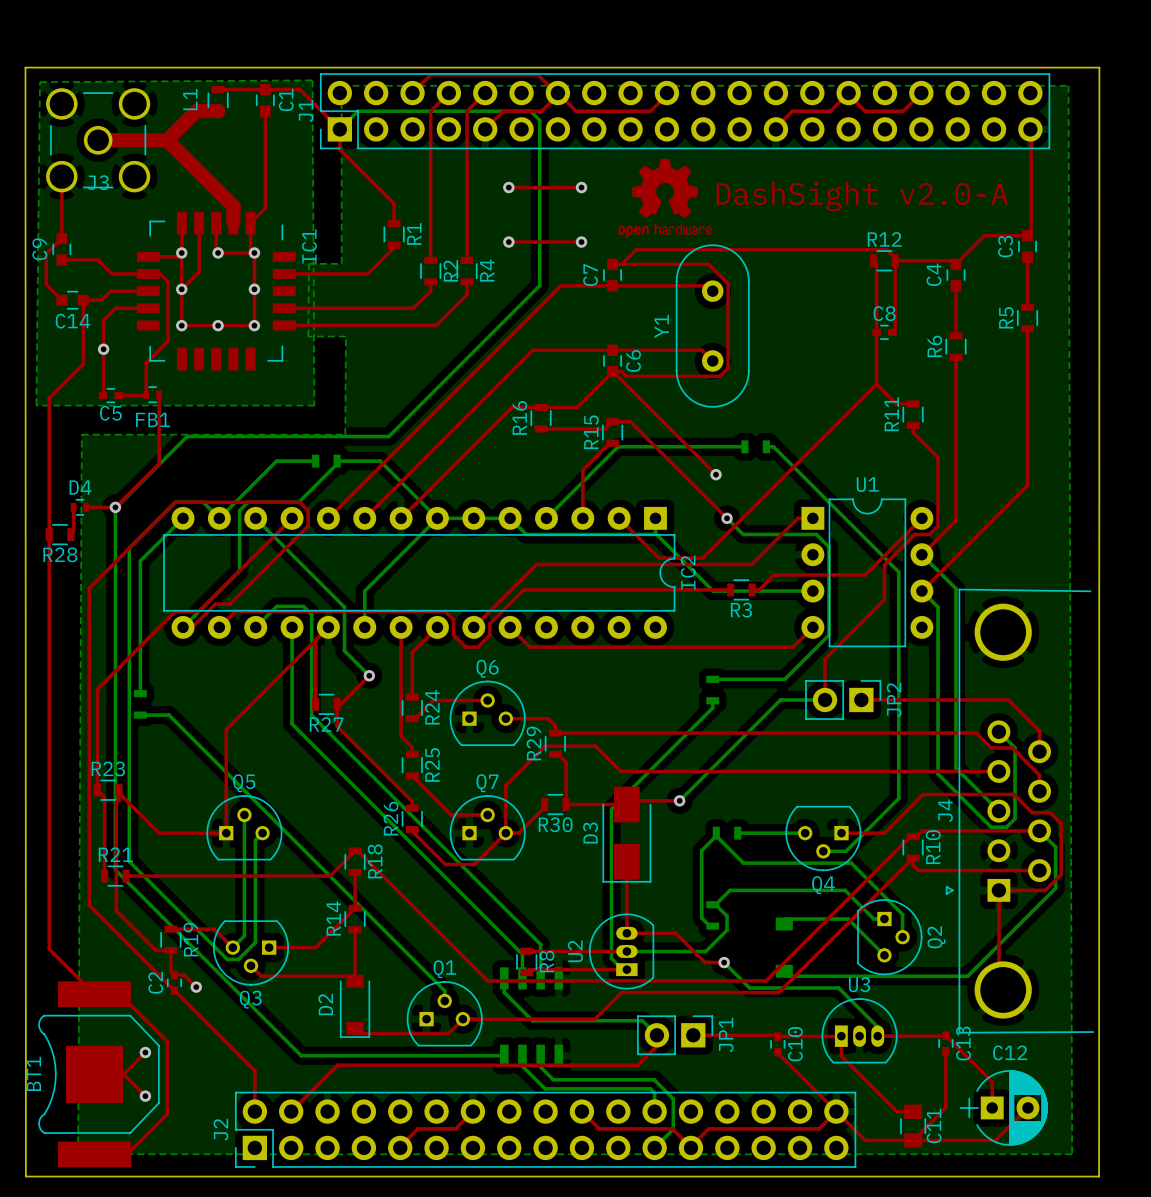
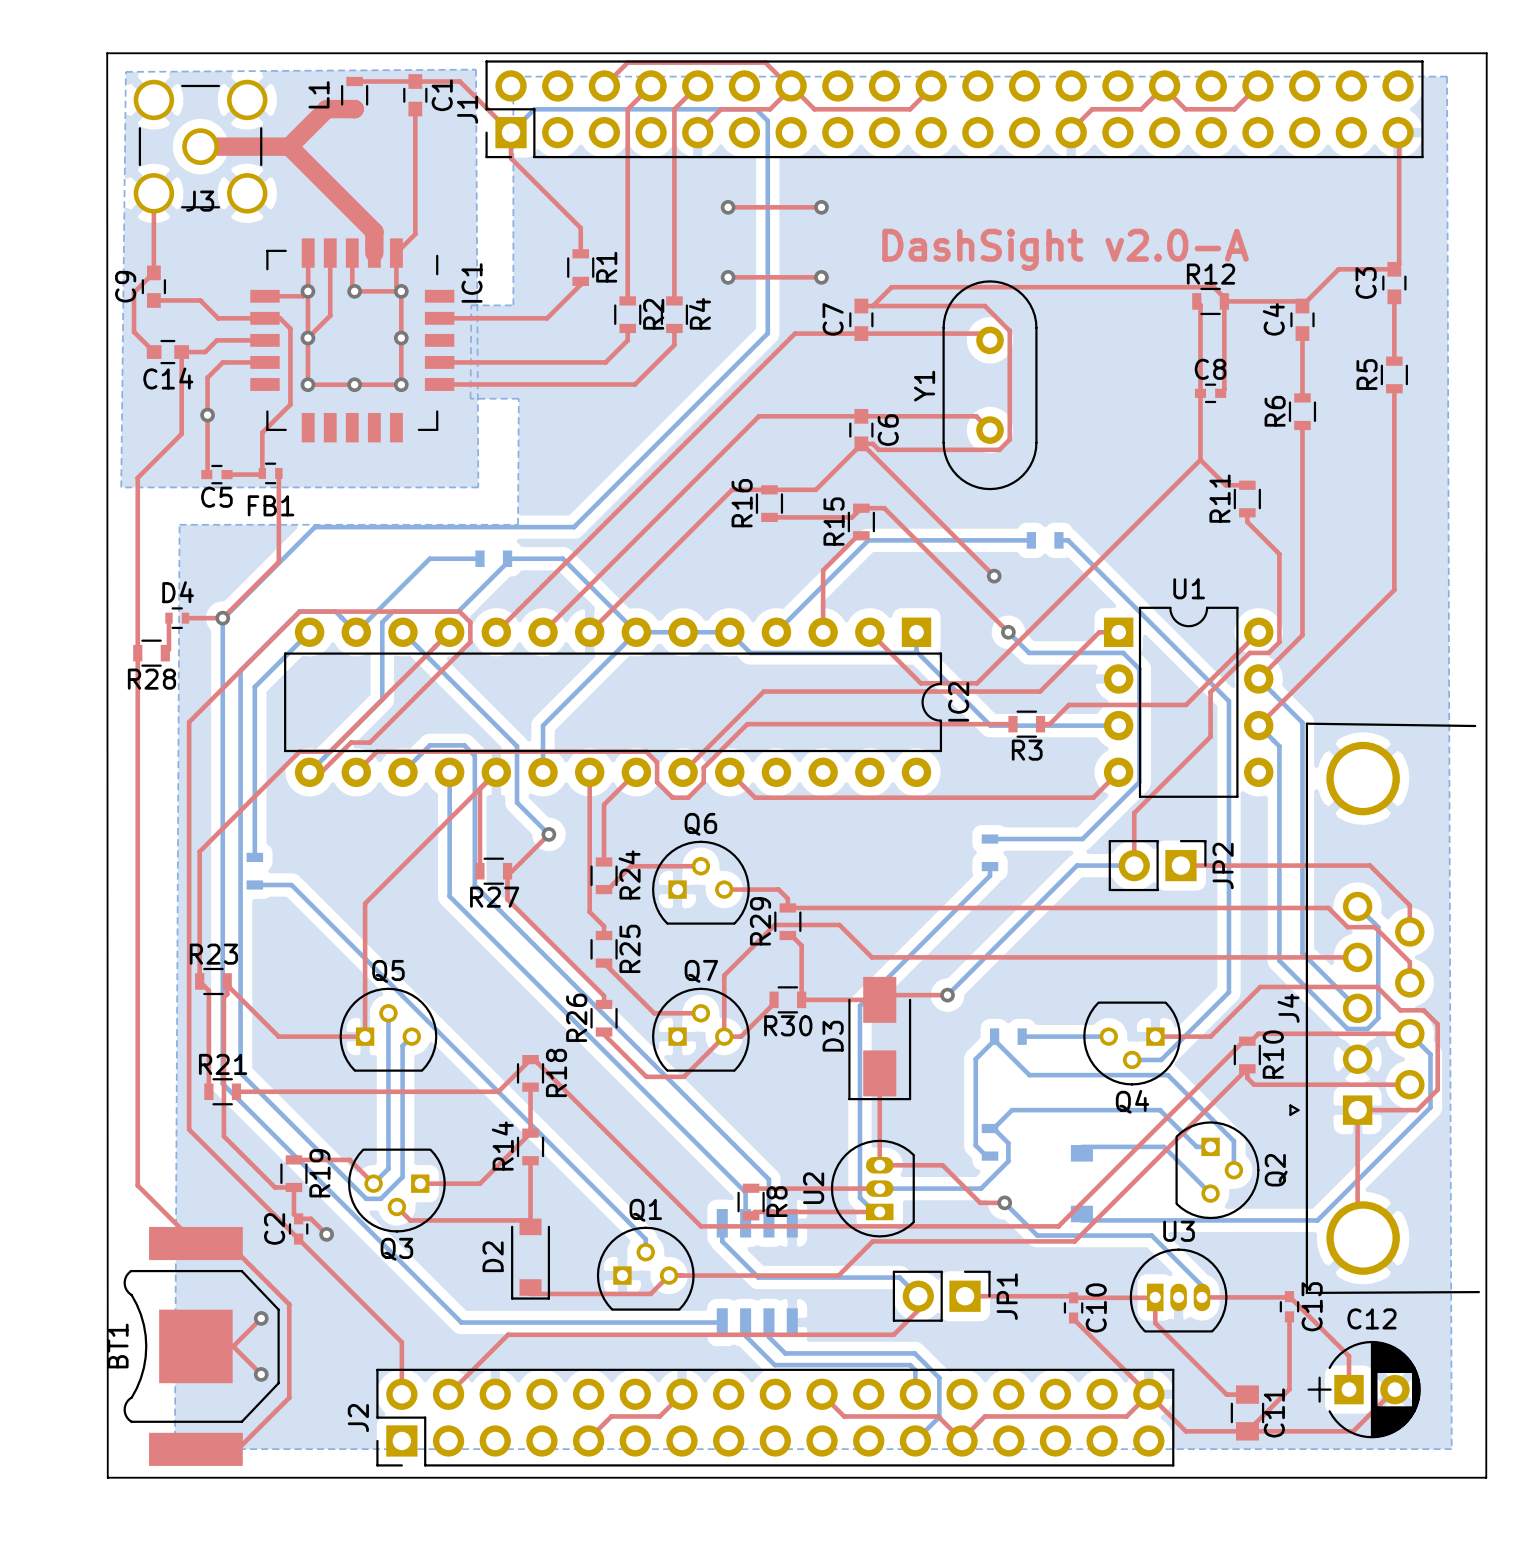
drawing: [618, 158, 712, 239] -> none
text position: DashSight v2.0-A (862, 196) -> DashSight v2.0-A (1065, 249)

